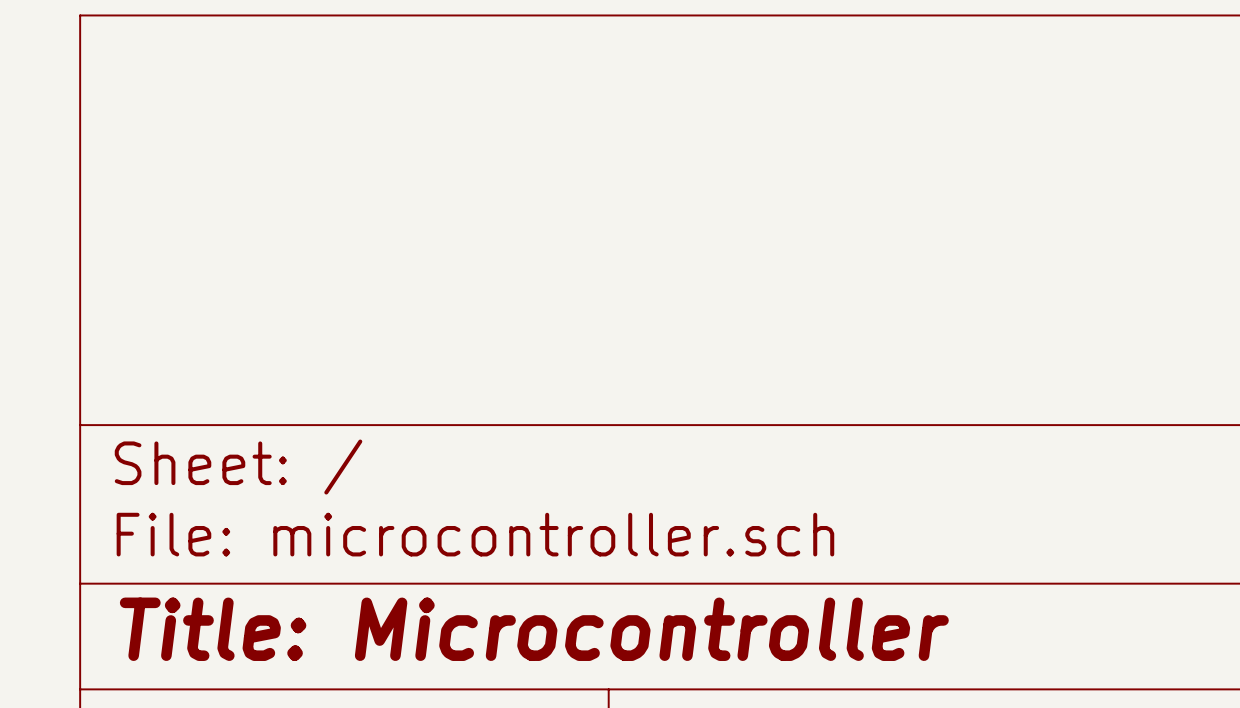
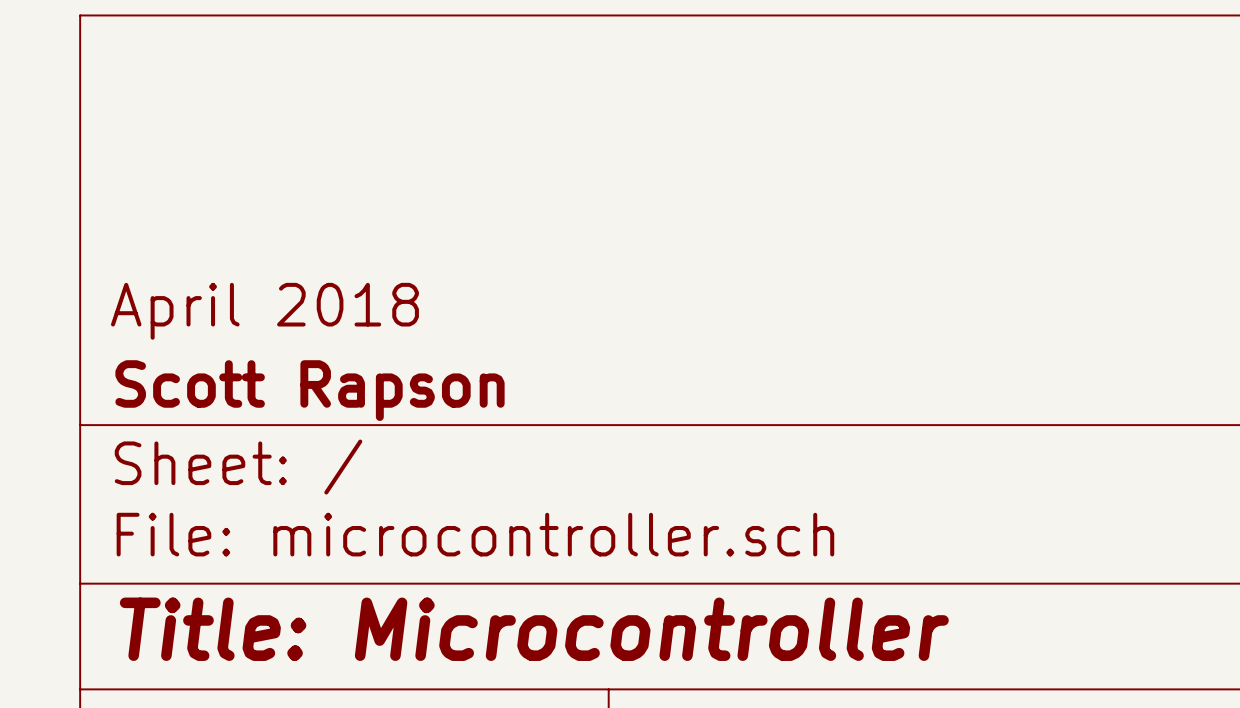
title block: none -> April 2018 (264, 311)
title block: none -> Scott Rapson (310, 390)

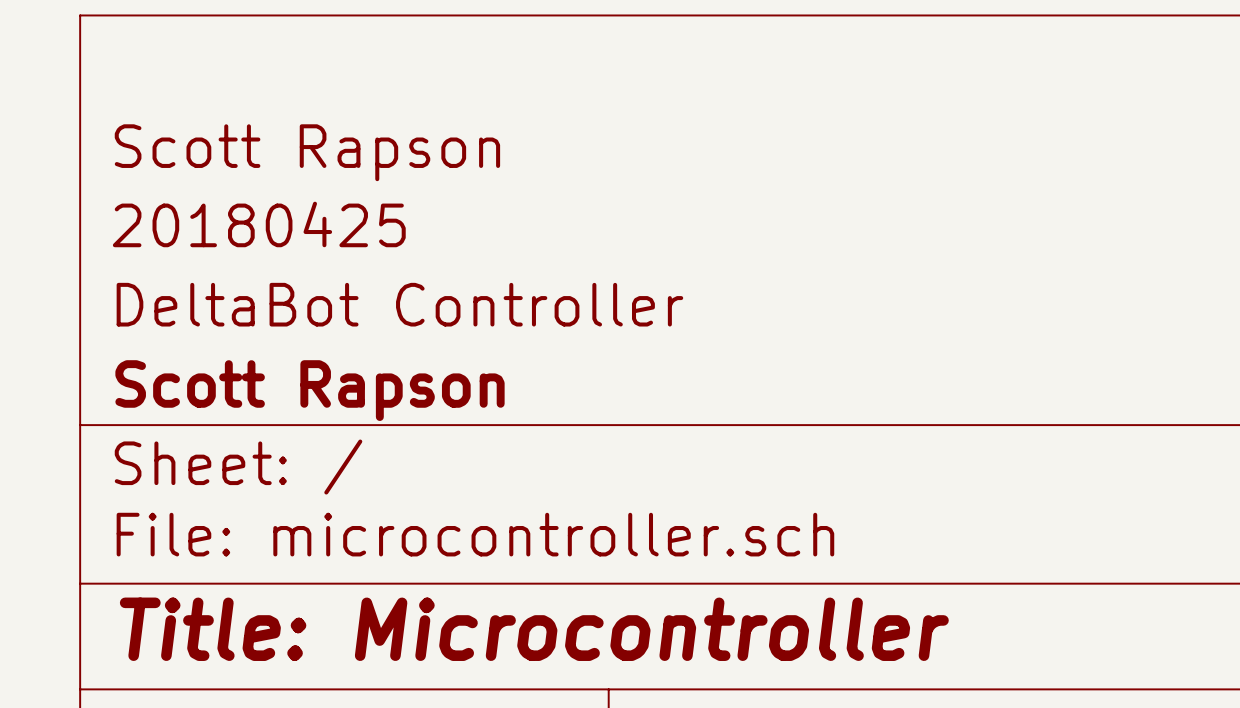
title block: none -> Scott Rapson (307, 152)
title block: none -> 20180425 (259, 224)
title block: April 2018 (264, 311) -> DeltaBot Controller (399, 304)

